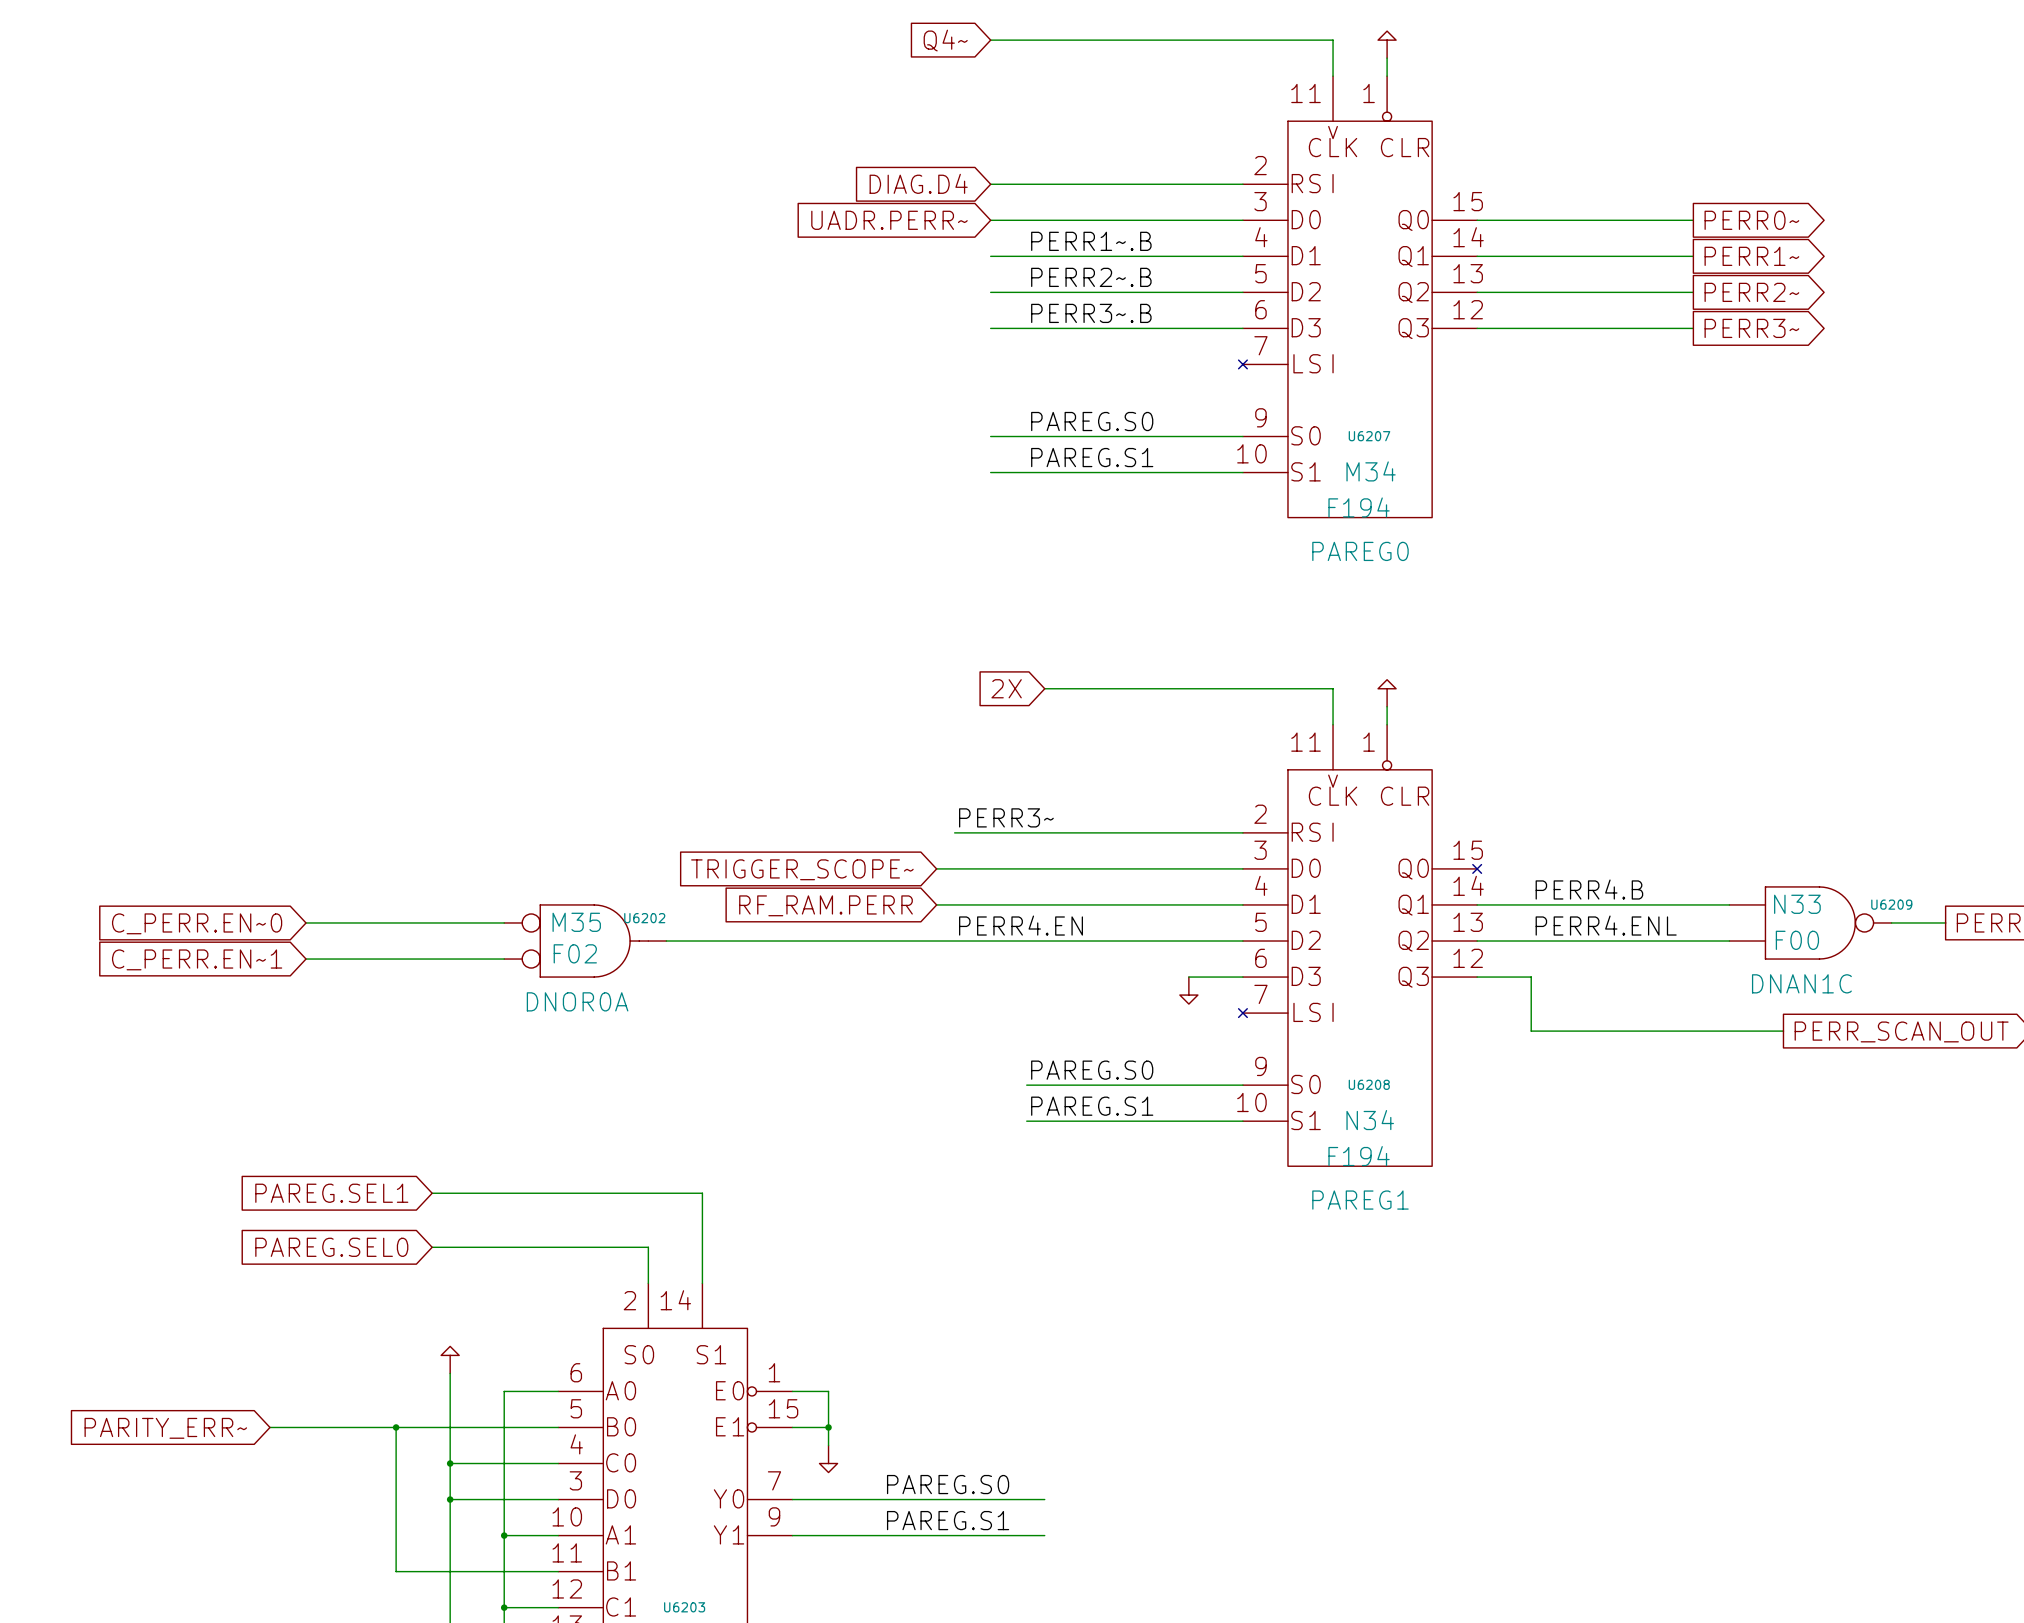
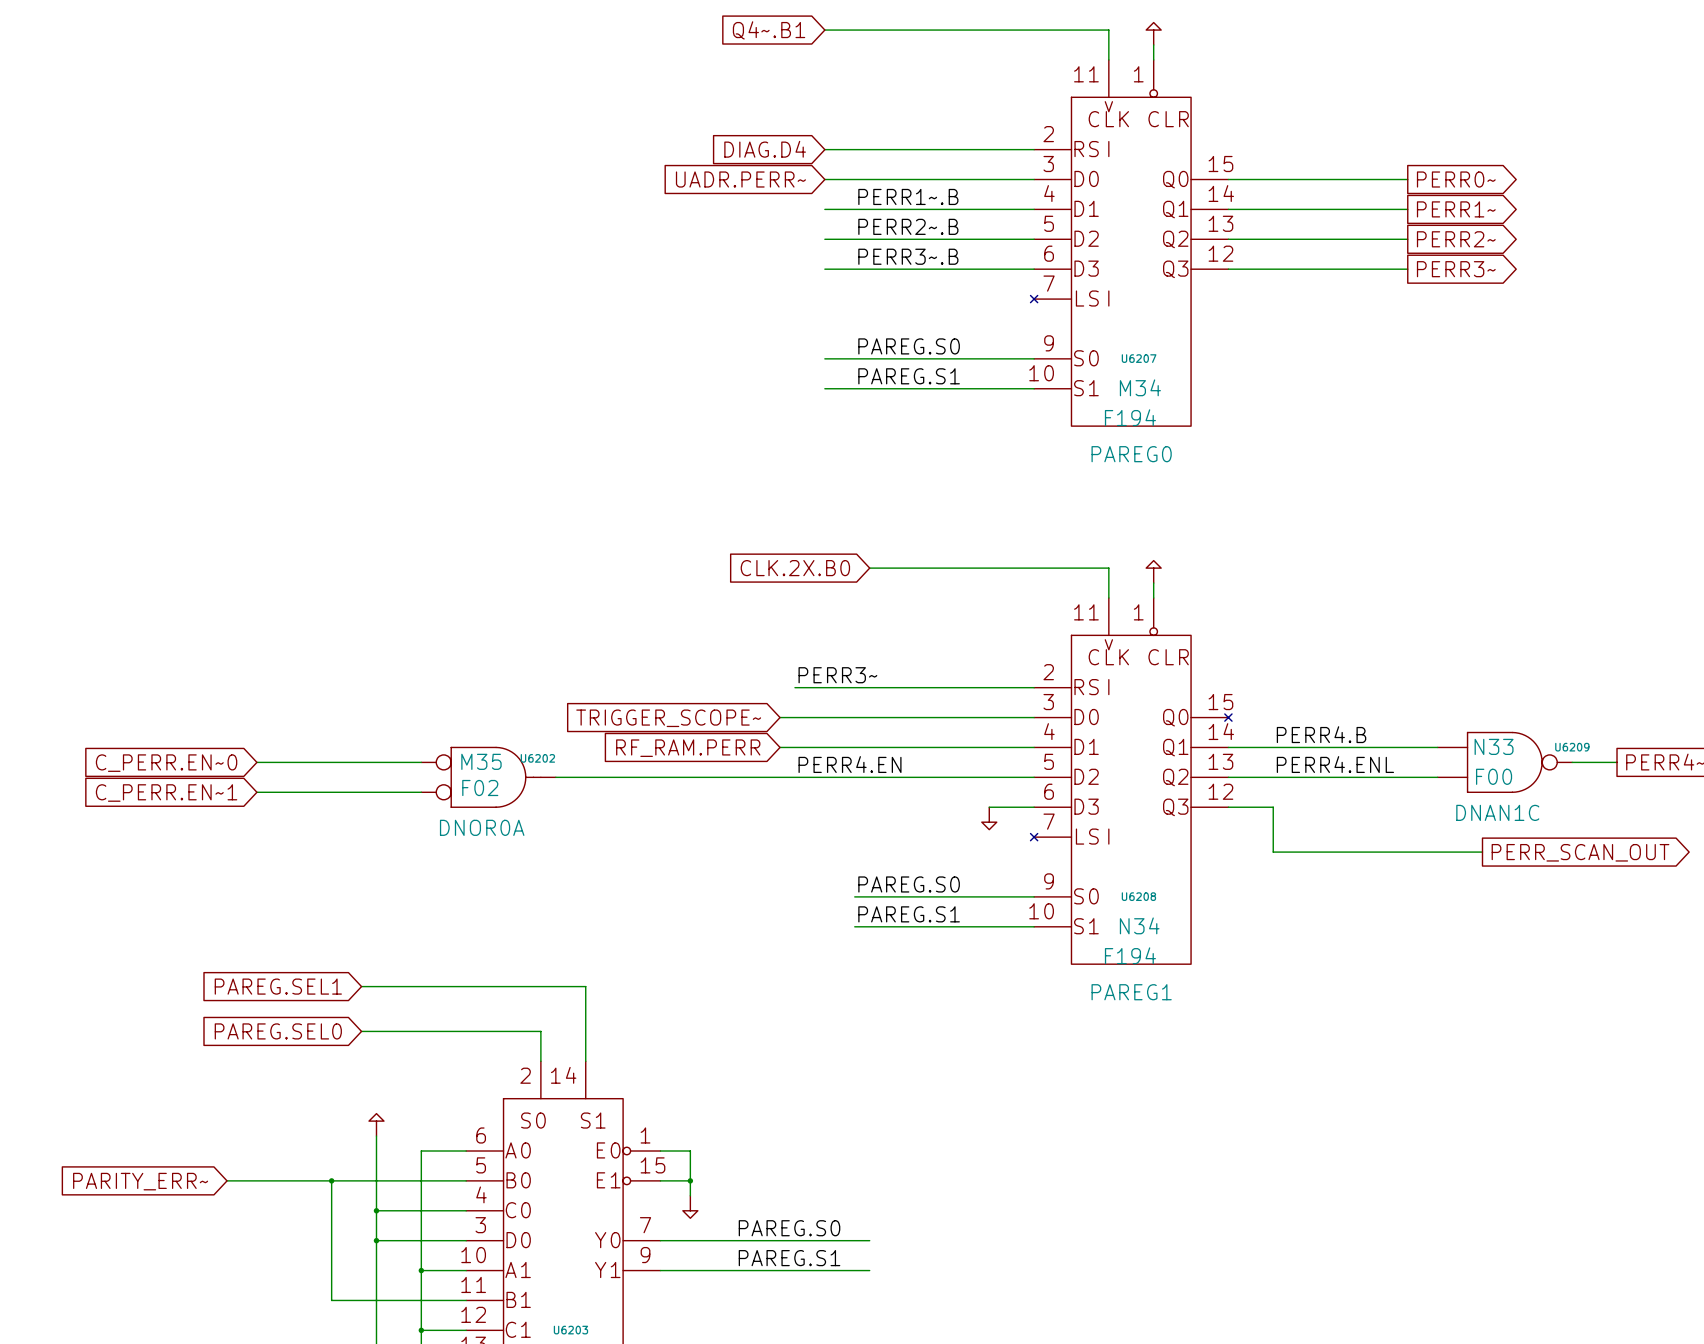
global label: Q4~ (945, 40) -> Q4~.B1 (769, 30)
global label: 2X (1006, 688) -> CLK.2X.B0 (795, 568)

